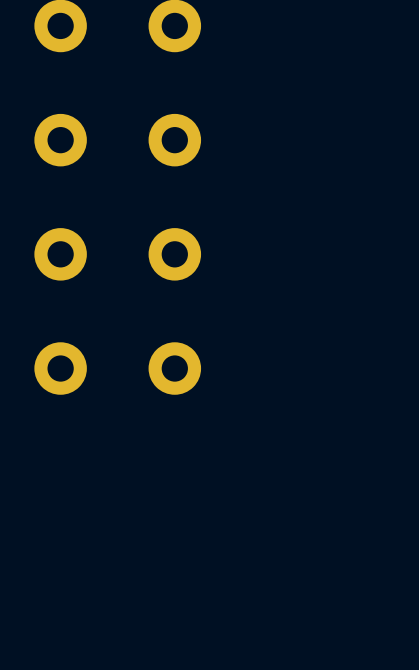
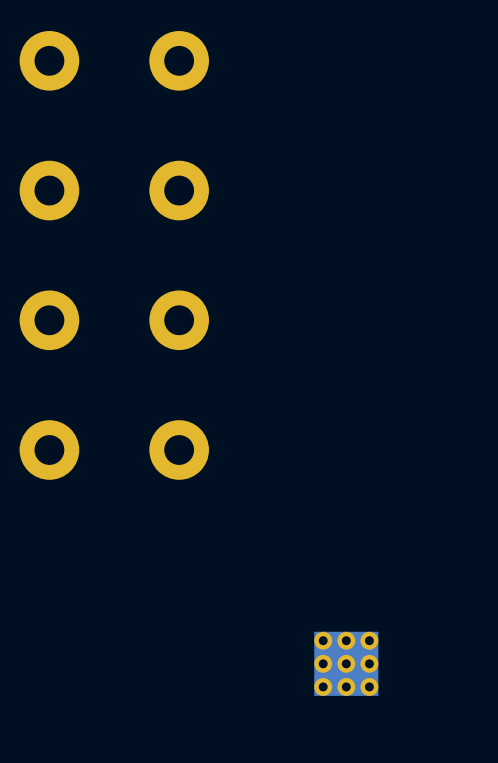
part: none -> (346, 663)

